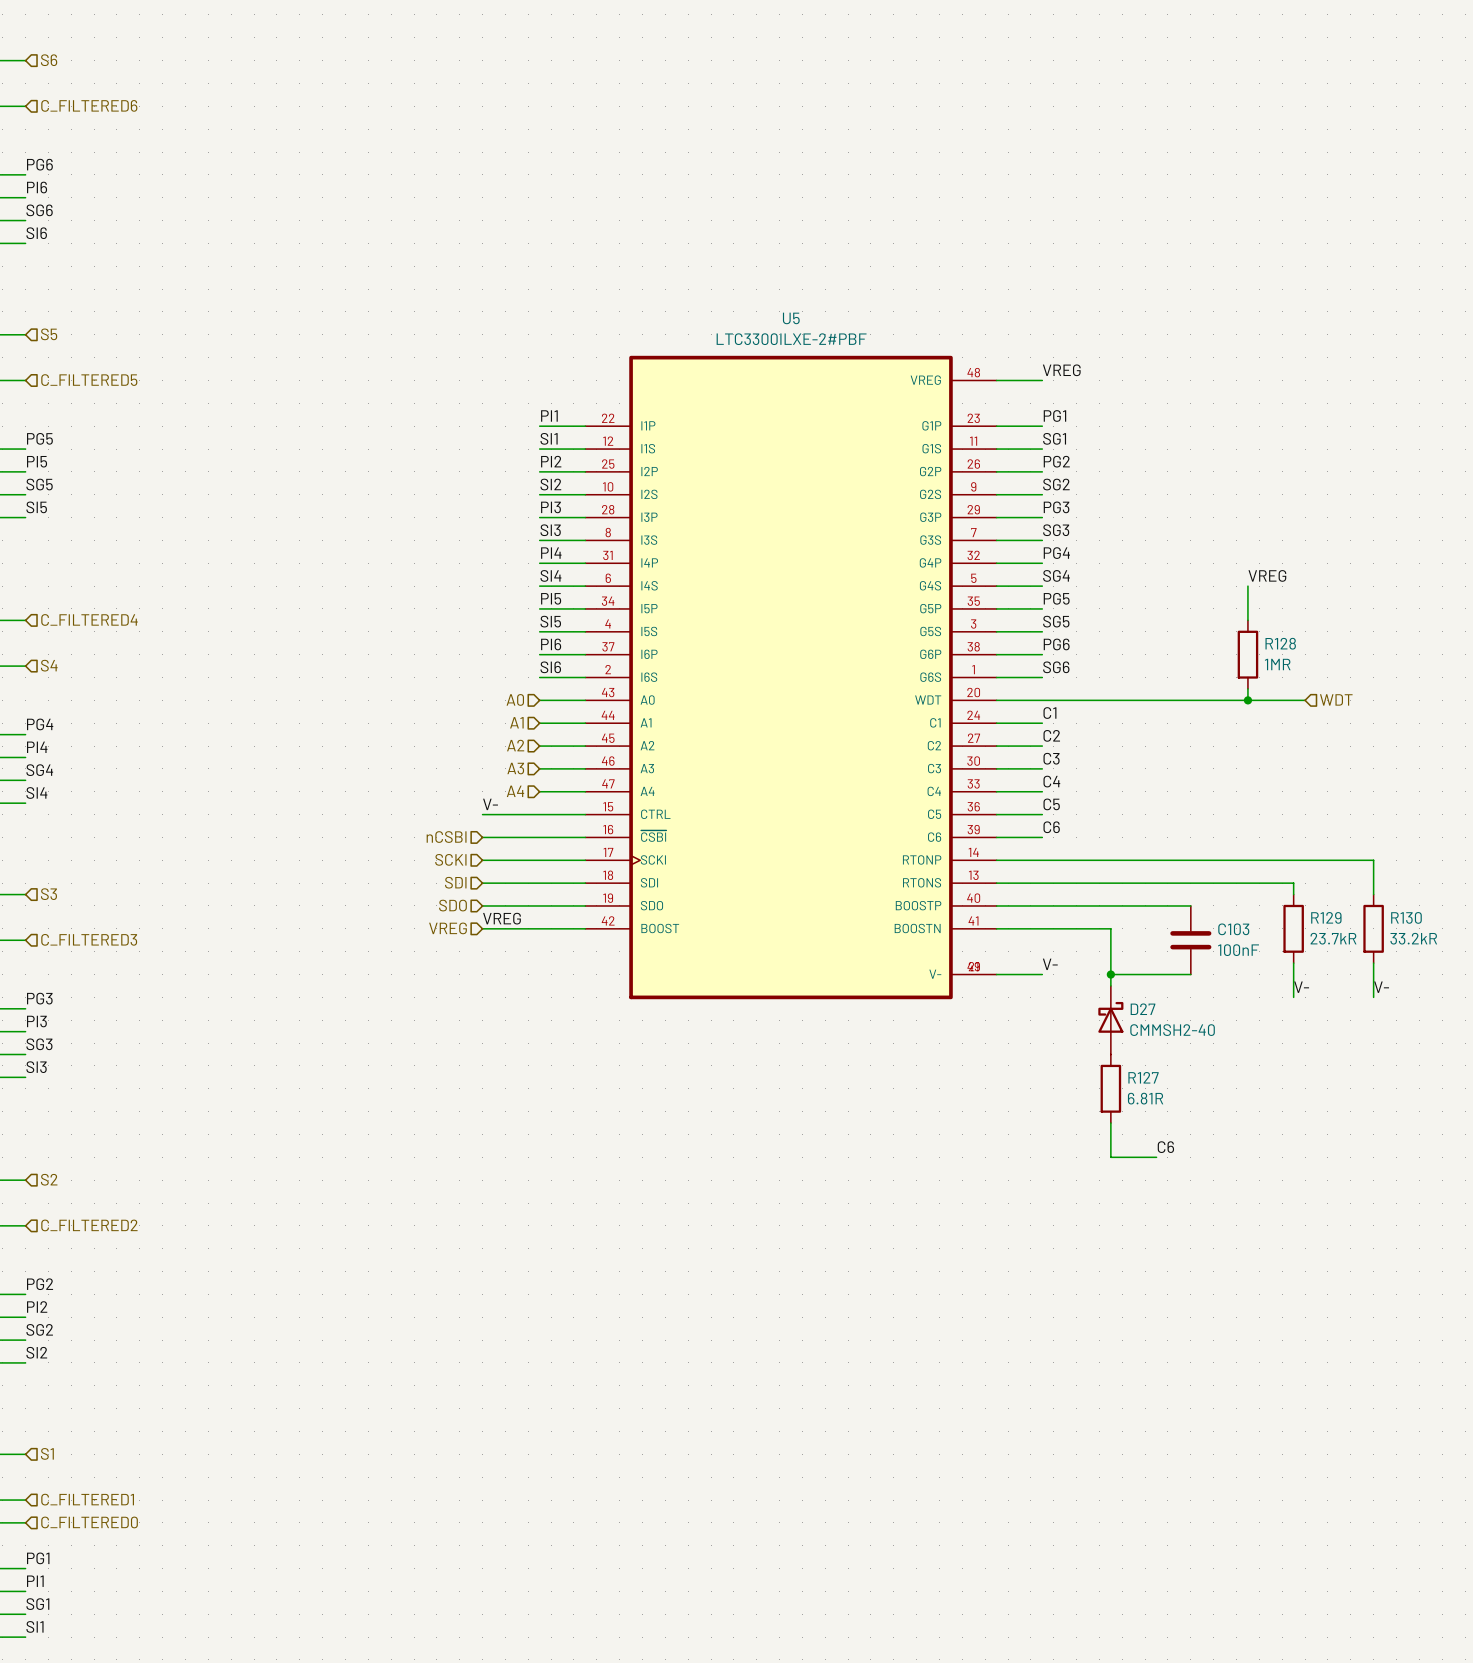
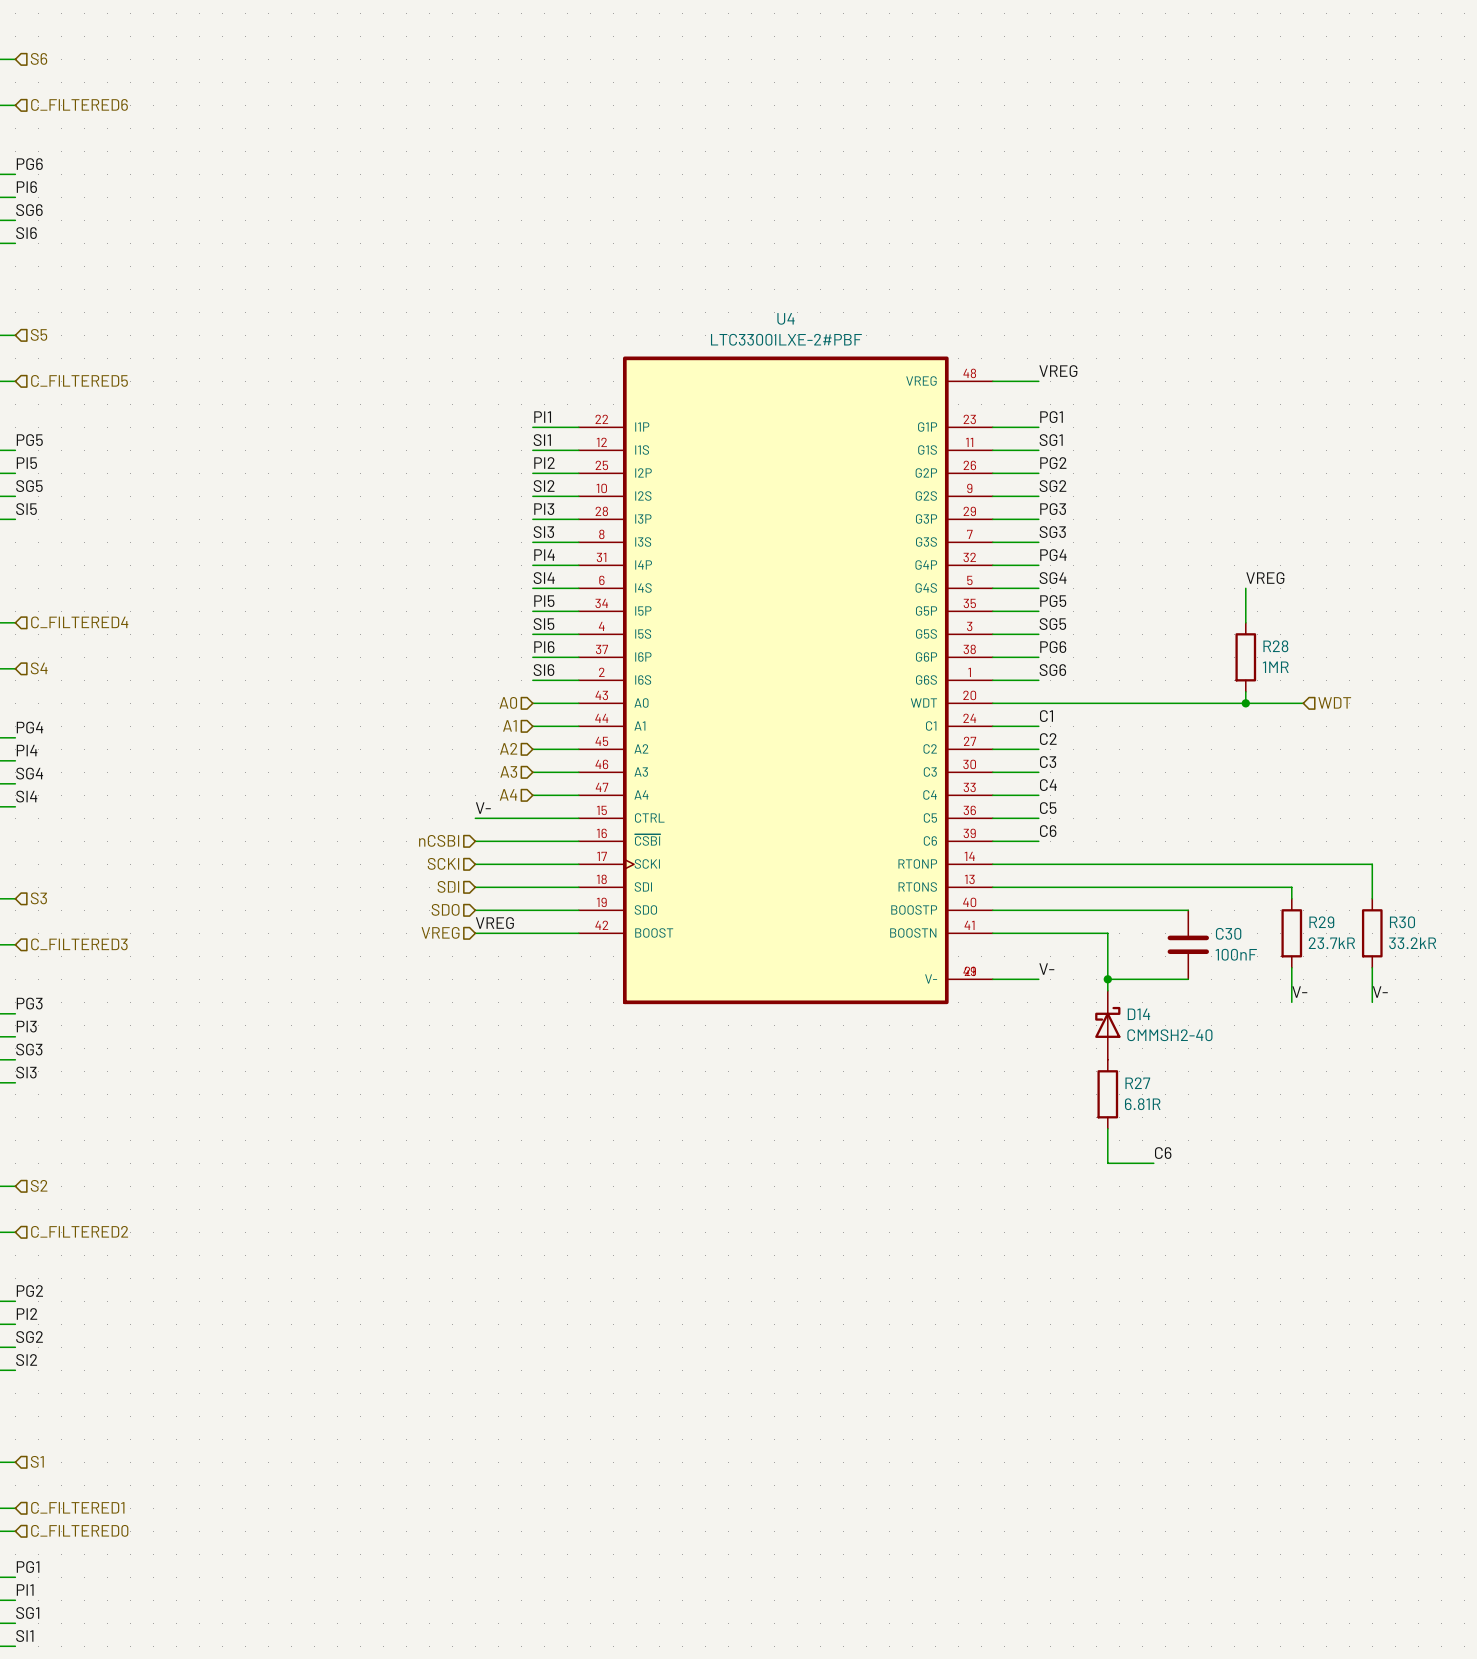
U5 name: U5 (791, 318) -> U4 (786, 318)
R128 name: R128 (1280, 643) -> R28 (1275, 646)
R129 name: R129 (1326, 917) -> R29 (1321, 922)
R130 name: R130 (1406, 917) -> R30 (1402, 922)
C103 name: C103 (1233, 929) -> C30 (1228, 933)
D27 name: D27 (1143, 1009) -> D14 (1138, 1014)
R127 name: R127 (1143, 1077) -> R27 (1137, 1083)

